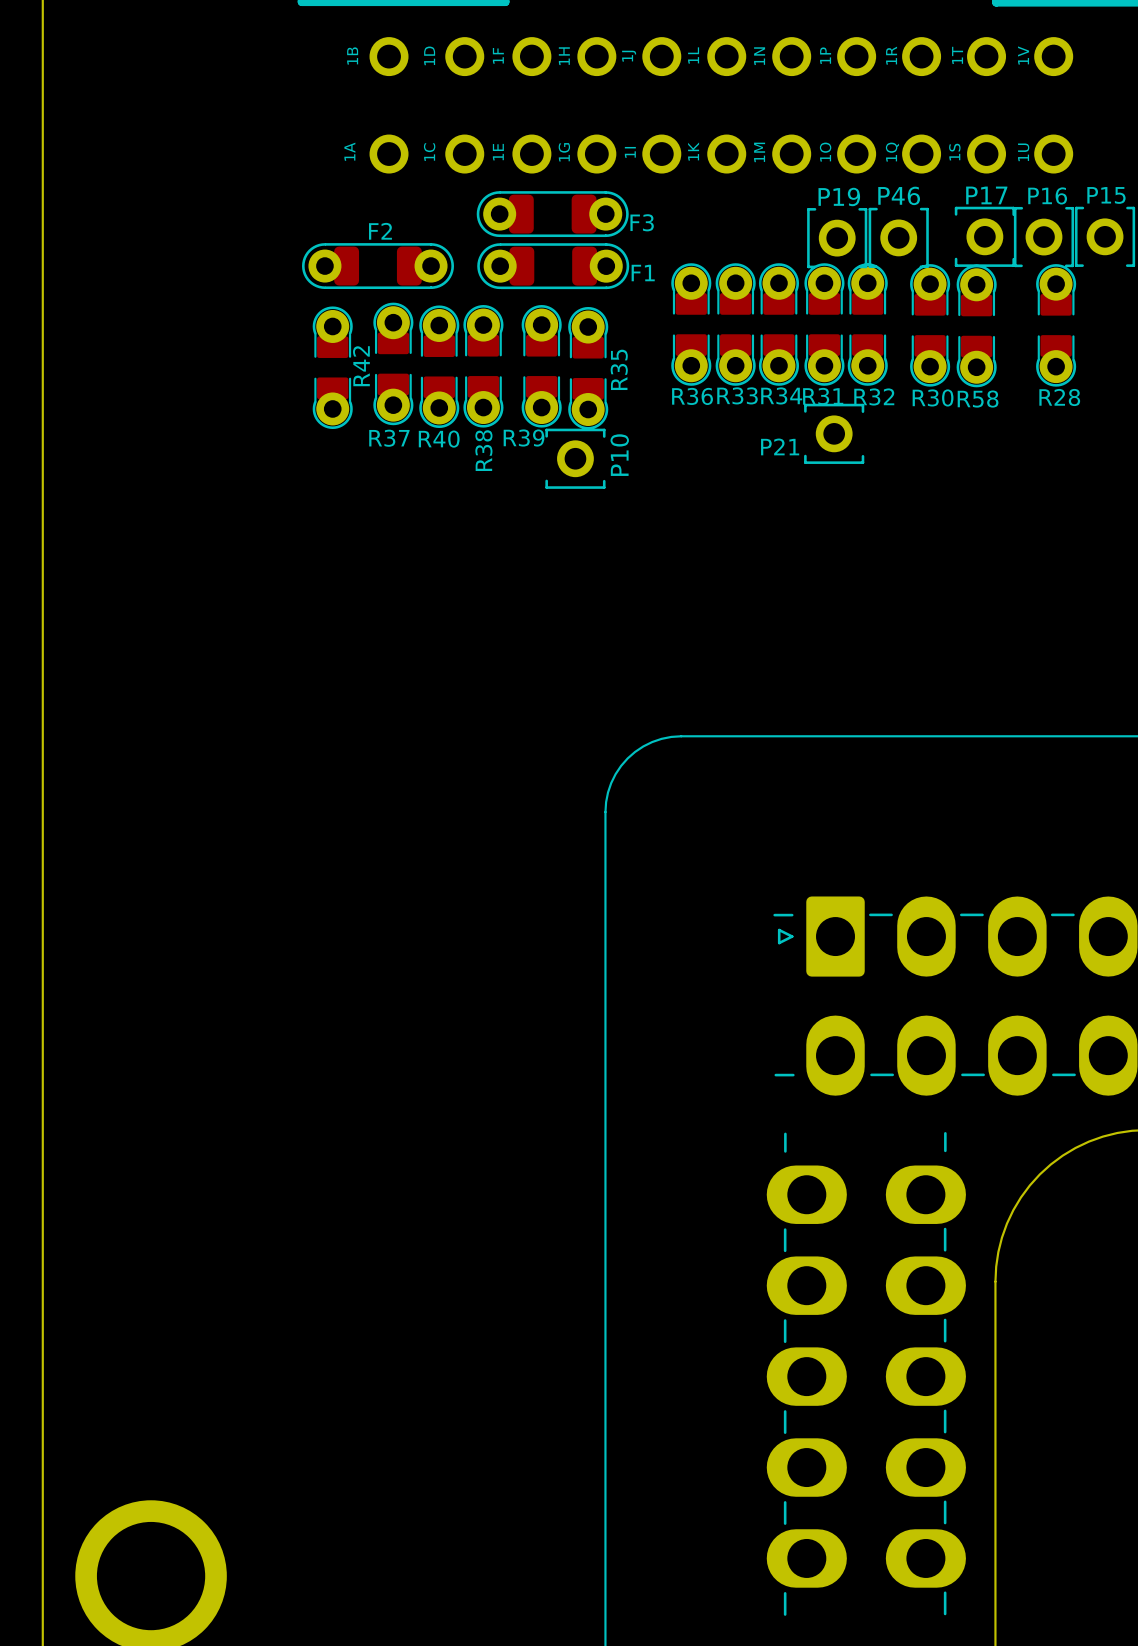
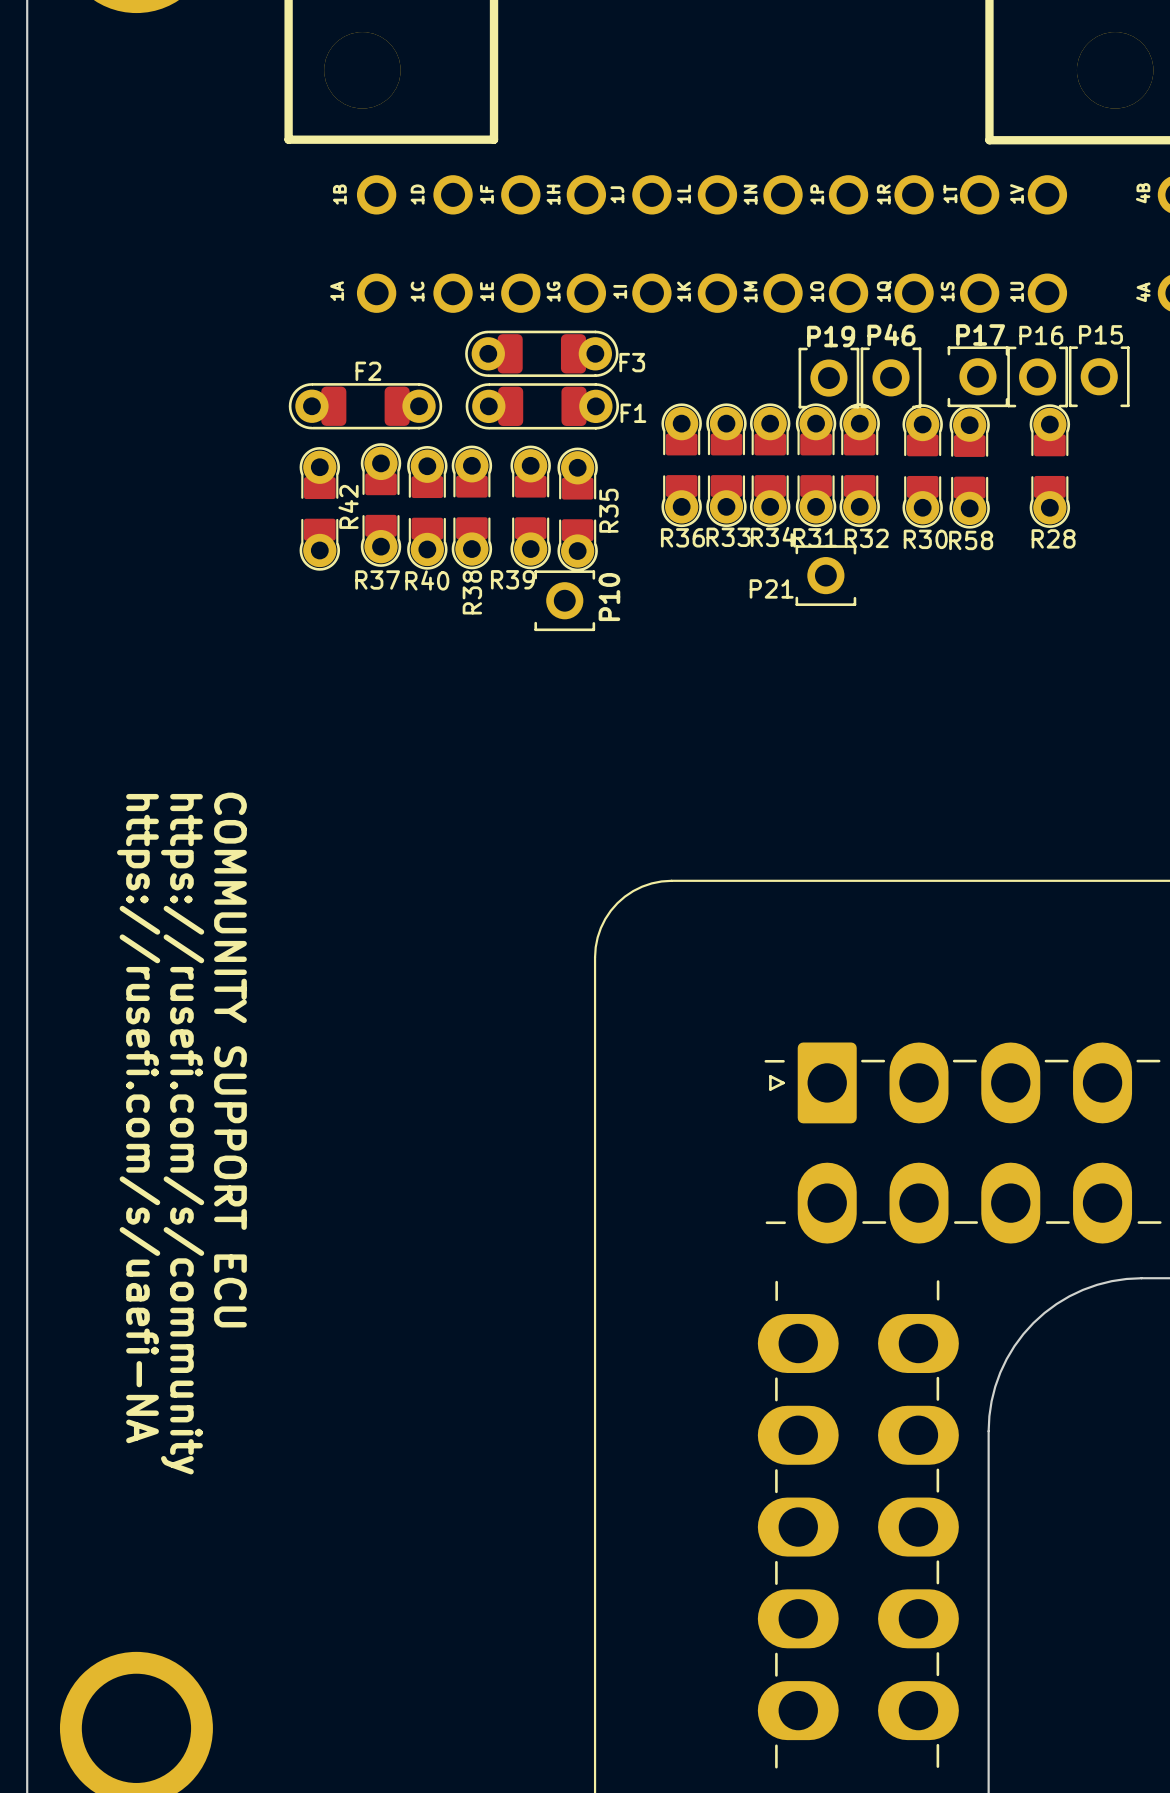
text: none -> COMMUNITY SUPPORT ECU (230, 1060)
text: none -> https://rusefi.com/s/uaefi-NA (138, 1118)
text: none -> https://rusefi.com/s/community (182, 1134)

